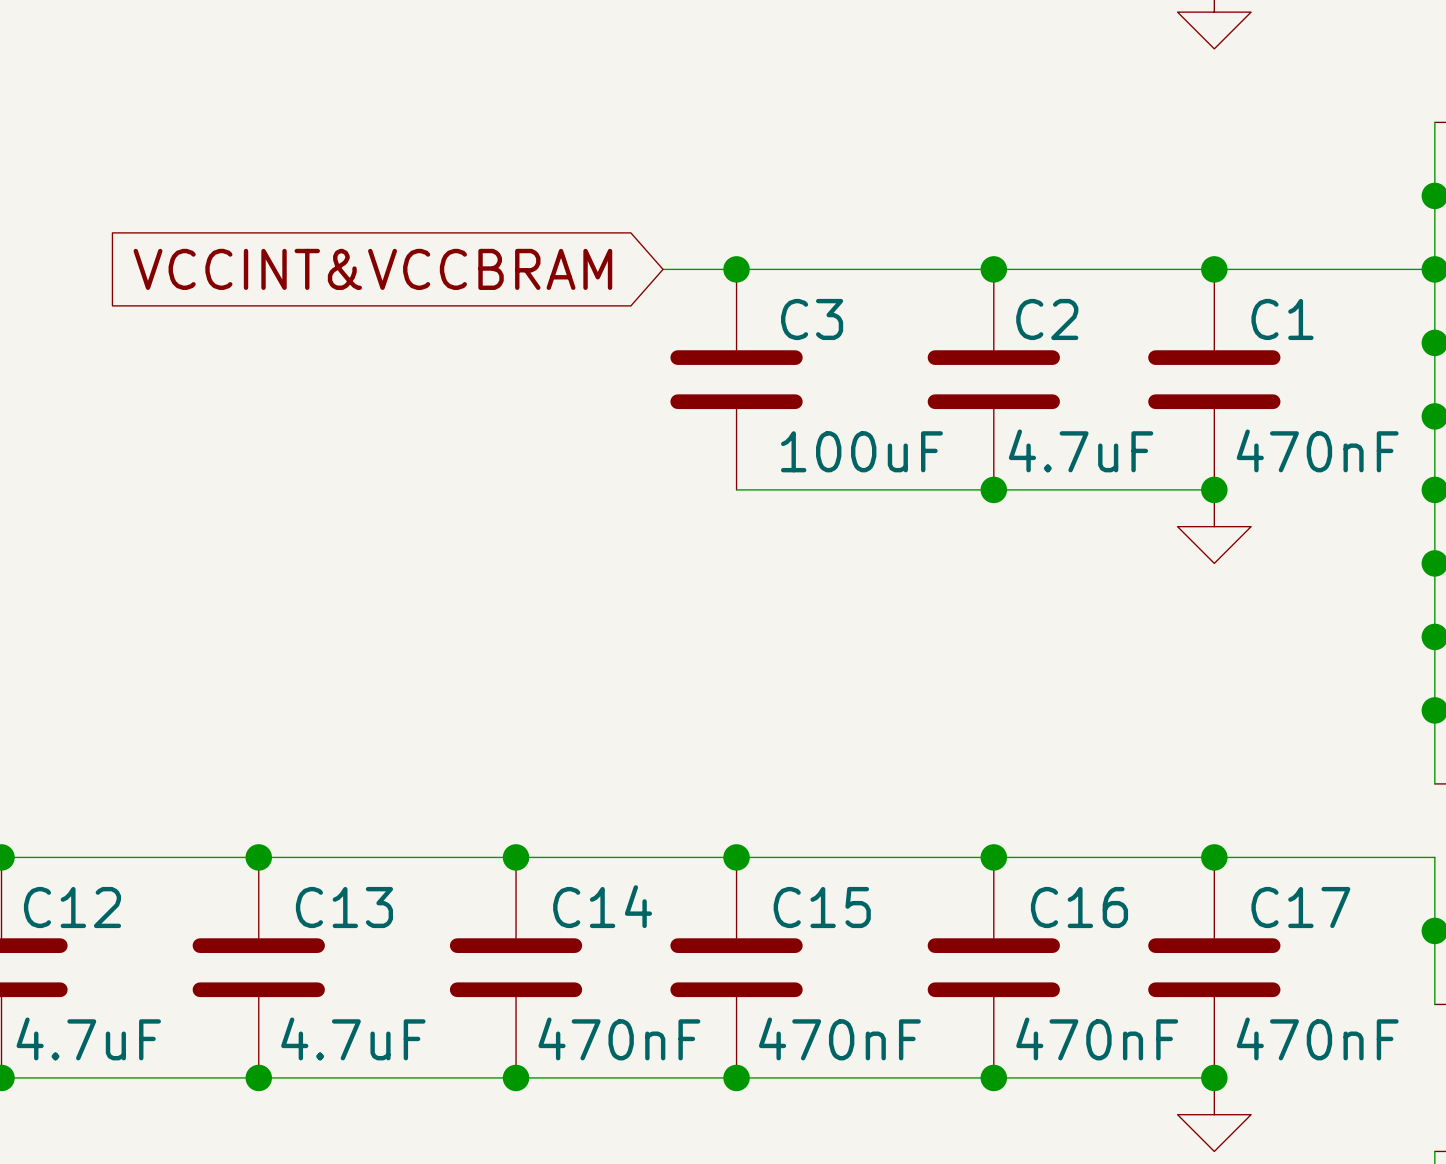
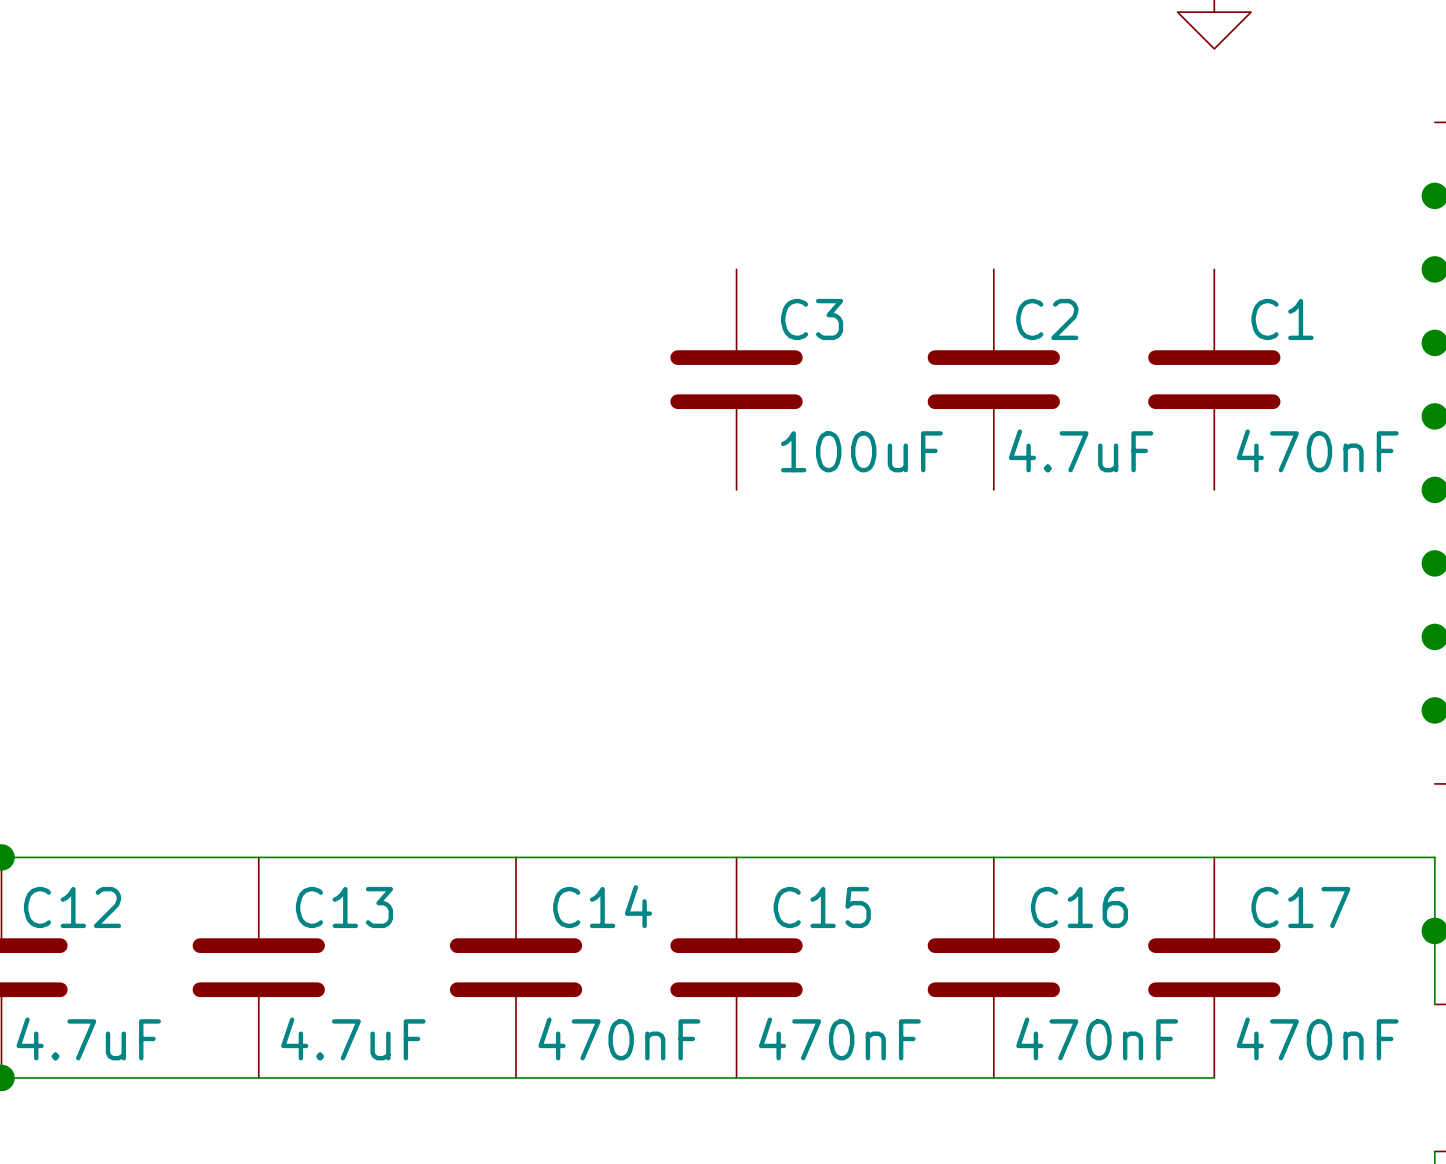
wire: (1434, 122) (1434, 783) -> none
global label: VCCINT&VCCBRAM (372, 269) -> none
wire: (663, 269) (1434, 269) -> none
junction: (736, 269) -> none
junction: (993, 269) -> none
junction: (1214, 269) -> none
wire: (736, 489) (1214, 489) -> none
junction: (993, 489) -> none
junction: (1214, 489) -> none
power symbol: (1214, 526) -> none
junction: (258, 857) -> none
junction: (516, 857) -> none
junction: (736, 857) -> none
junction: (993, 857) -> none
junction: (1214, 857) -> none
junction: (258, 1077) -> none
junction: (516, 1077) -> none
junction: (736, 1077) -> none
junction: (993, 1077) -> none
junction: (1214, 1077) -> none
power symbol: (1214, 1114) -> none

